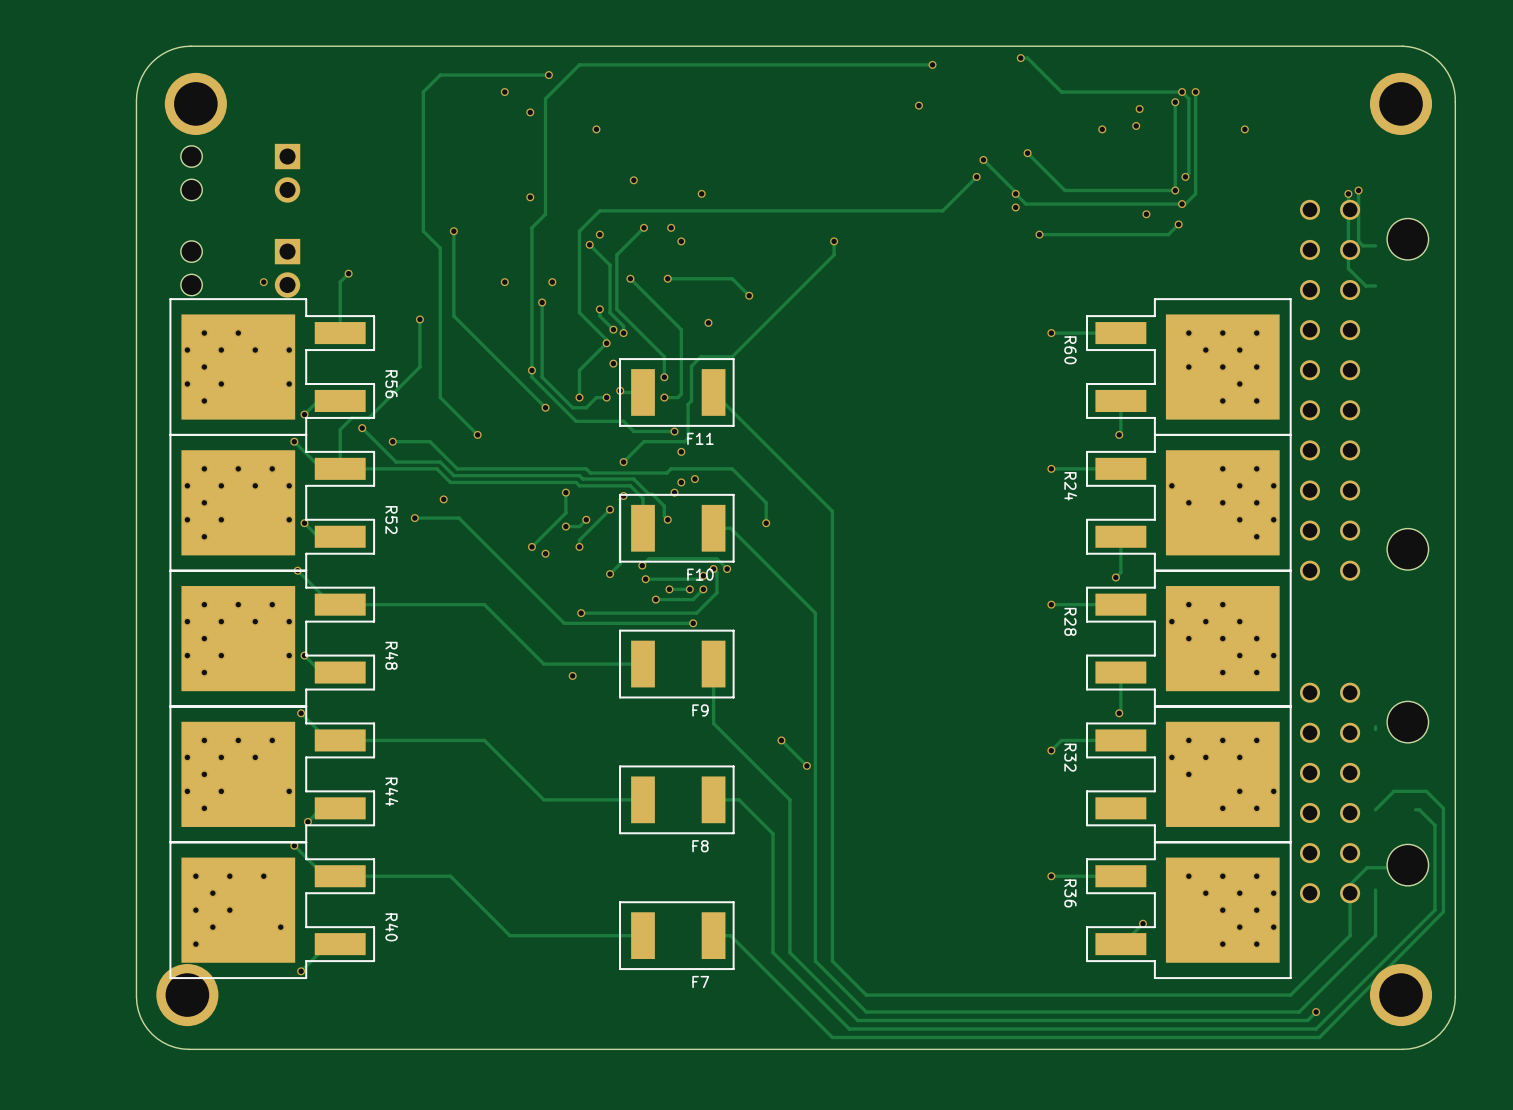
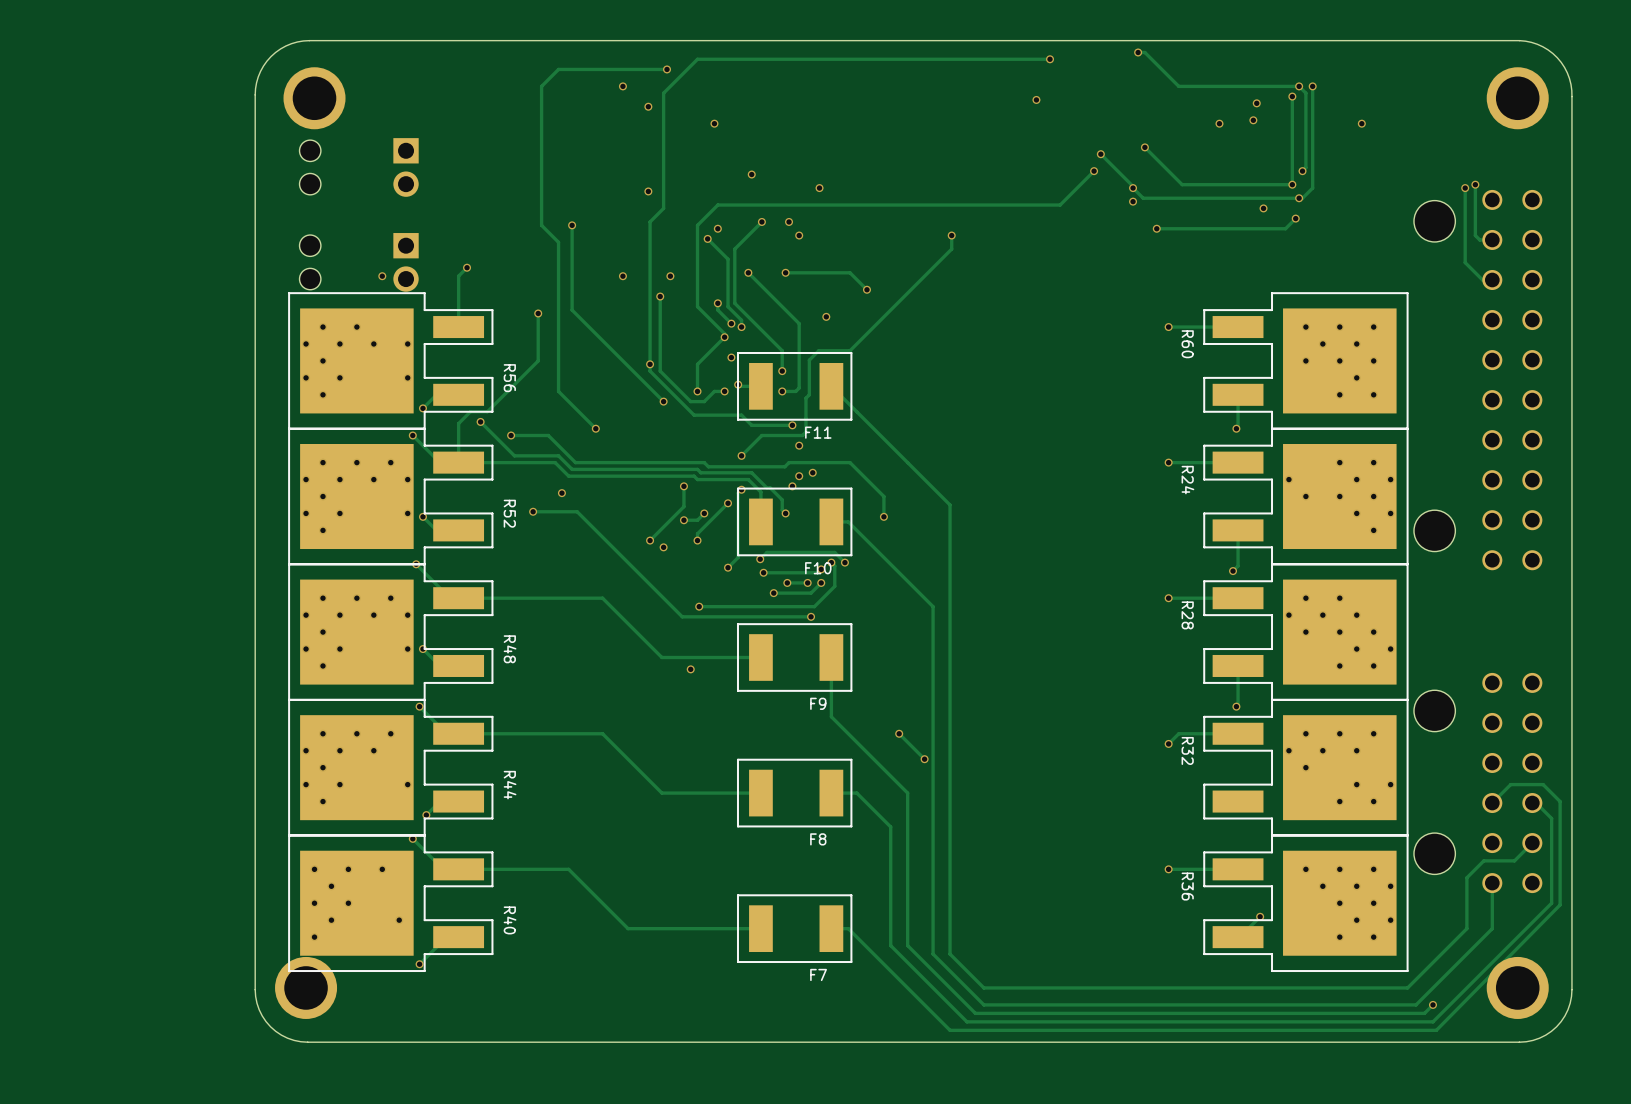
part rotation: 0° (1364, 390) -> 180° (1478, 380)
part rotation: 0° (1364, 792) -> 180° (1478, 783)

